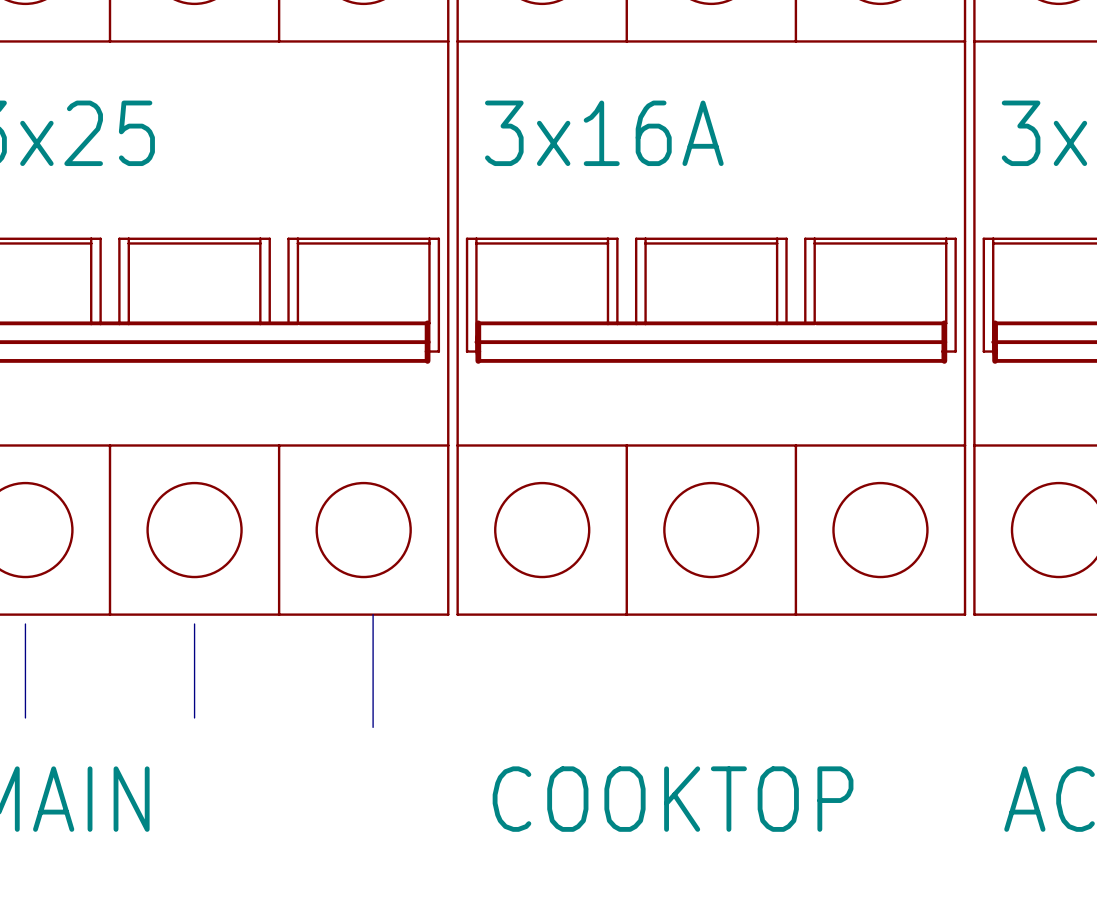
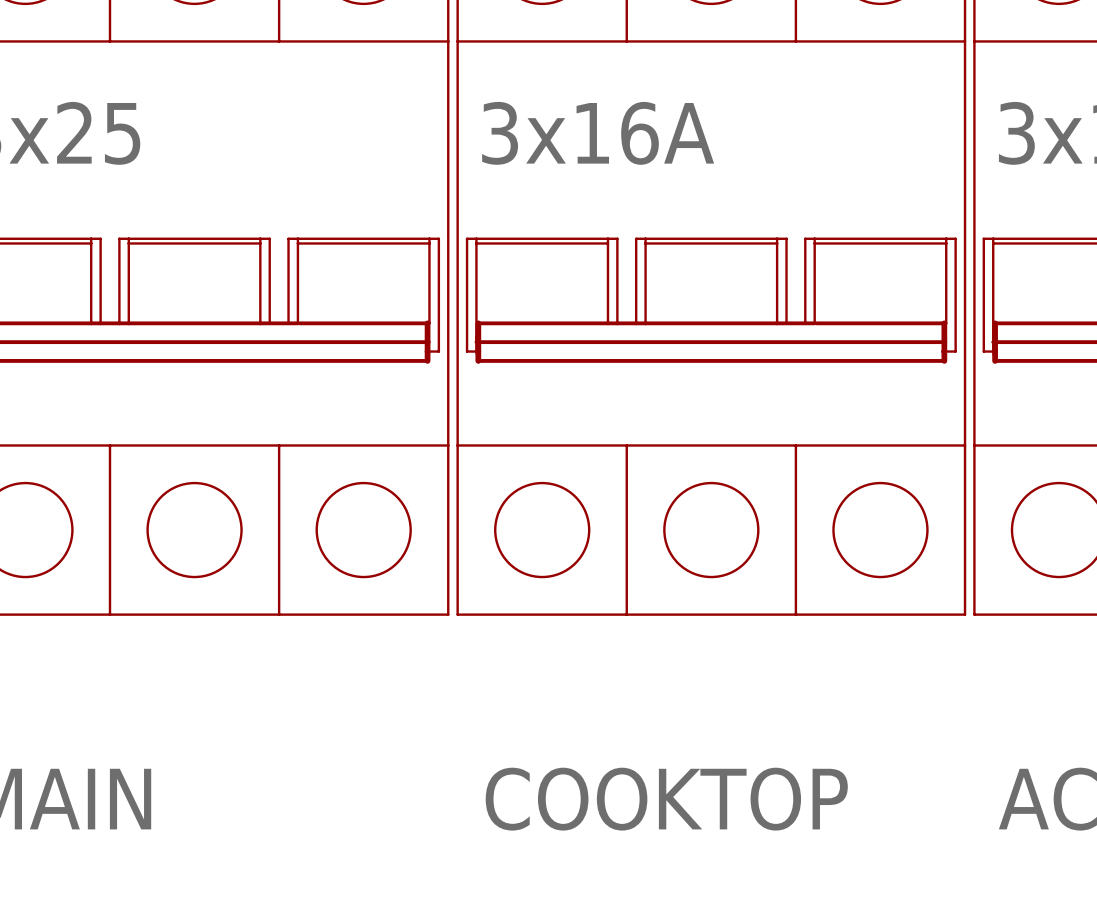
bus: (373, 614) (373, 727) -> none
bus: (25, 624) (25, 717) -> none
bus: (194, 624) (194, 717) -> none

